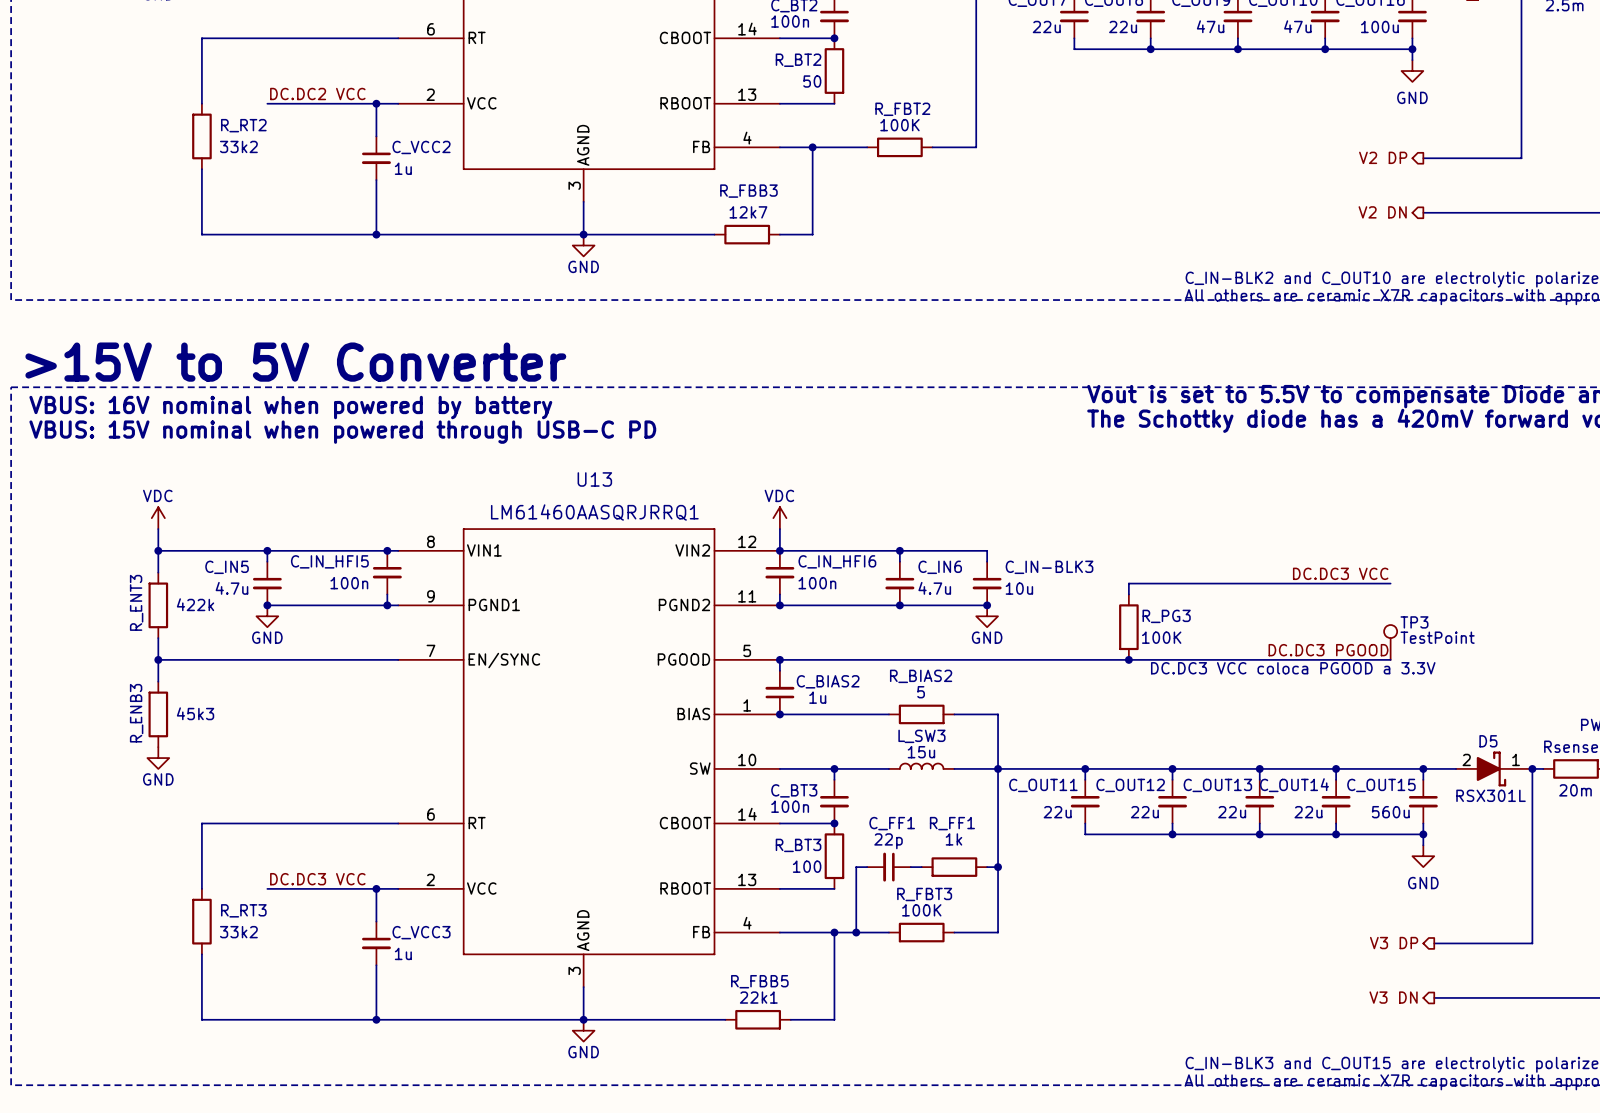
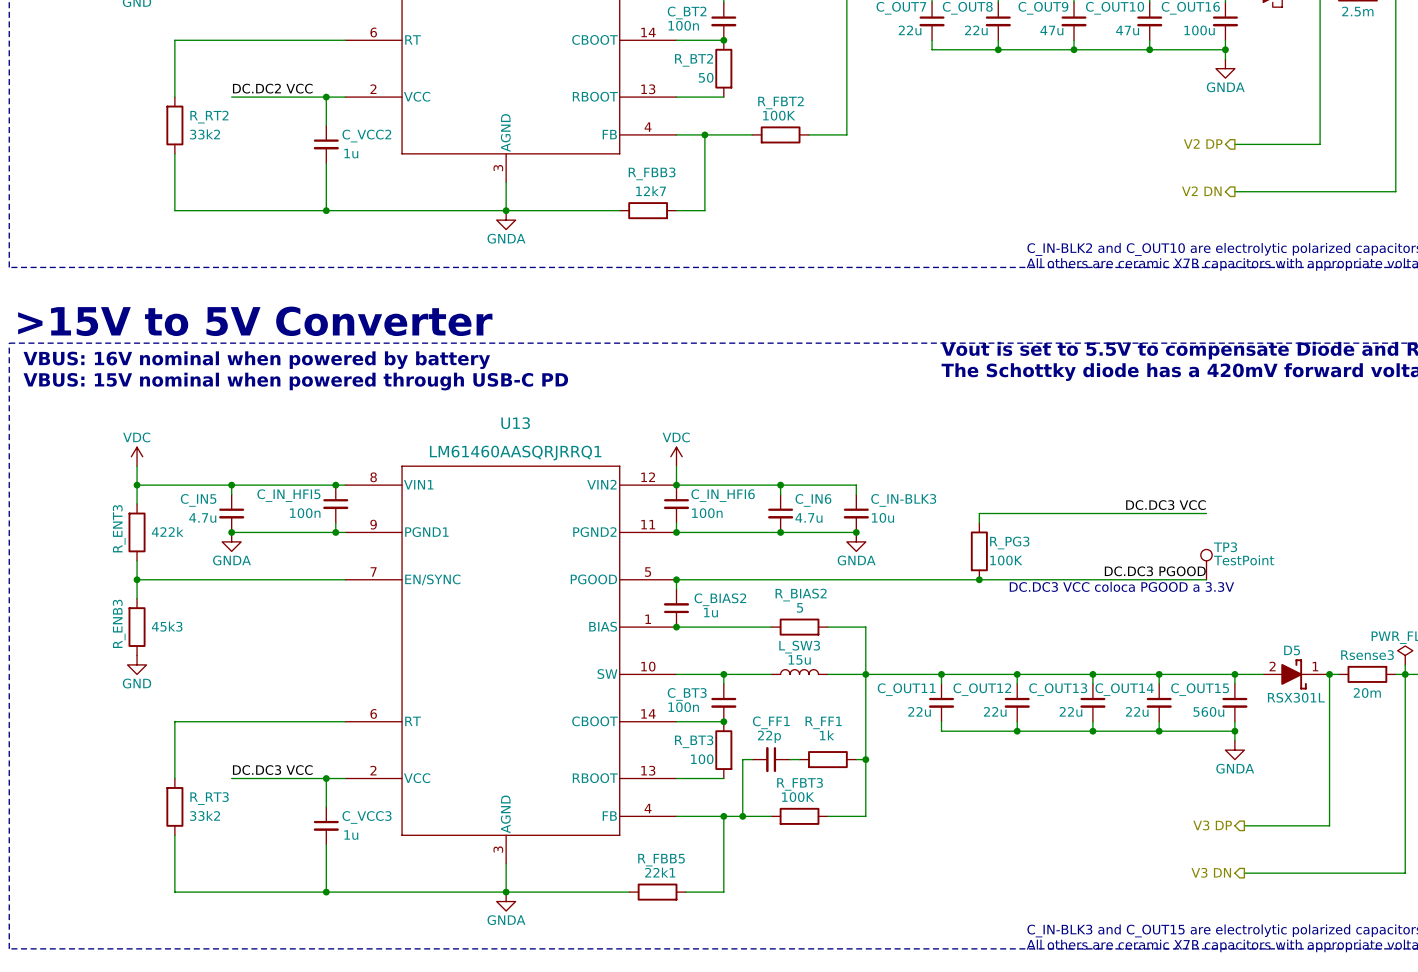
power symbol: GND (1412, 71) -> GNDA (1225, 68)
power symbol: GND (583, 245) -> GNDA (506, 220)
power symbol: GND (267, 616) -> GNDA (231, 541)
power symbol: GND (987, 616) -> GNDA (856, 541)
power symbol: GND (1423, 856) -> GNDA (1234, 750)
power symbol: GND (583, 1030) -> GNDA (506, 901)

